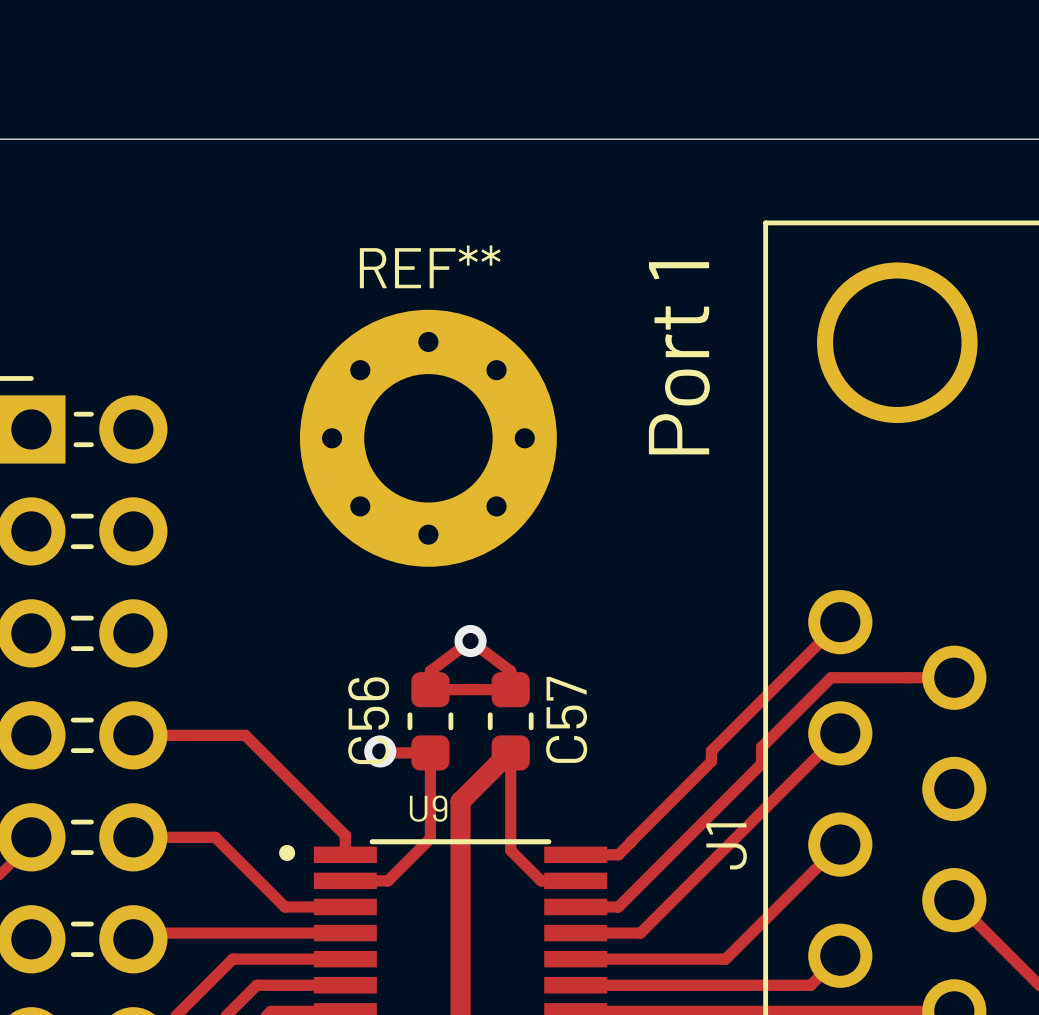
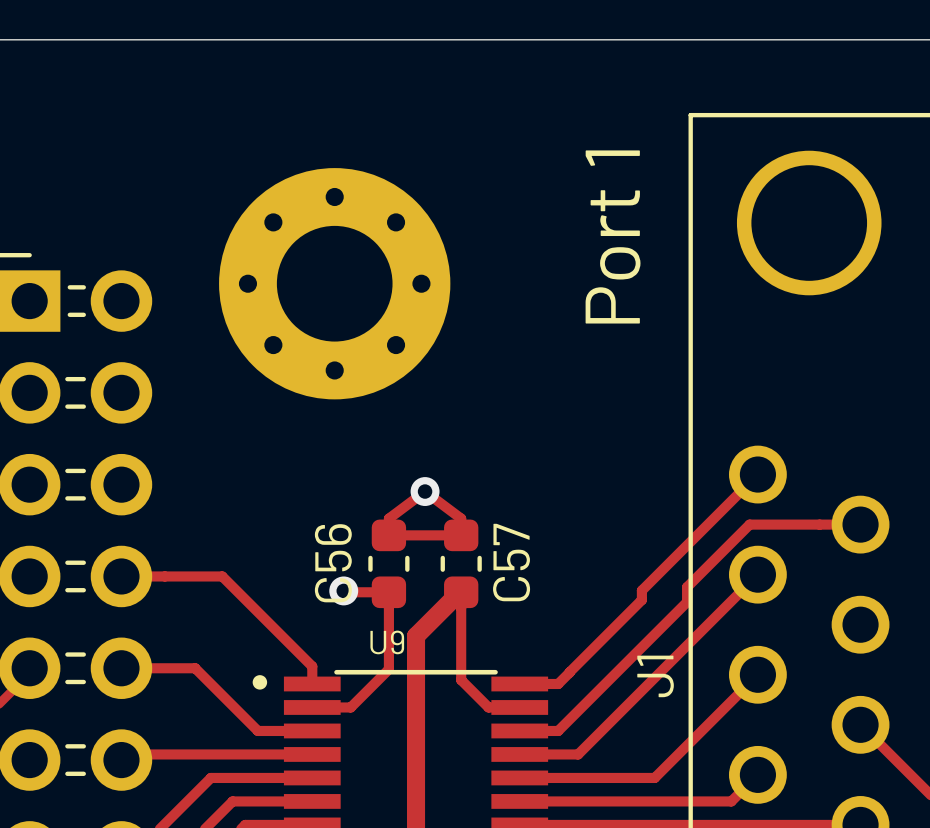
part: none -> (334, 283)
REF**: (428, 438) -> none

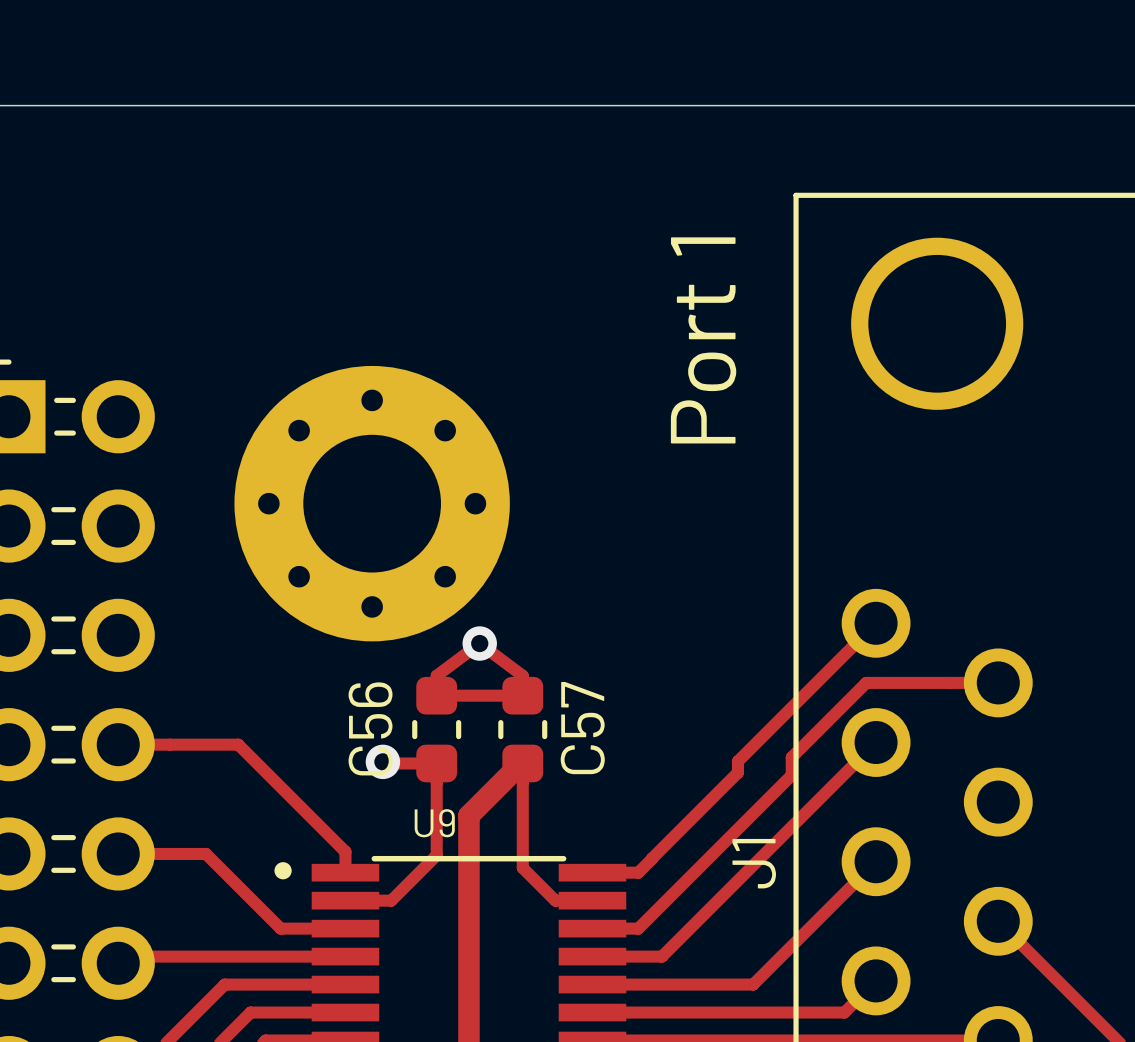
part position: (334, 283) -> (372, 503)

